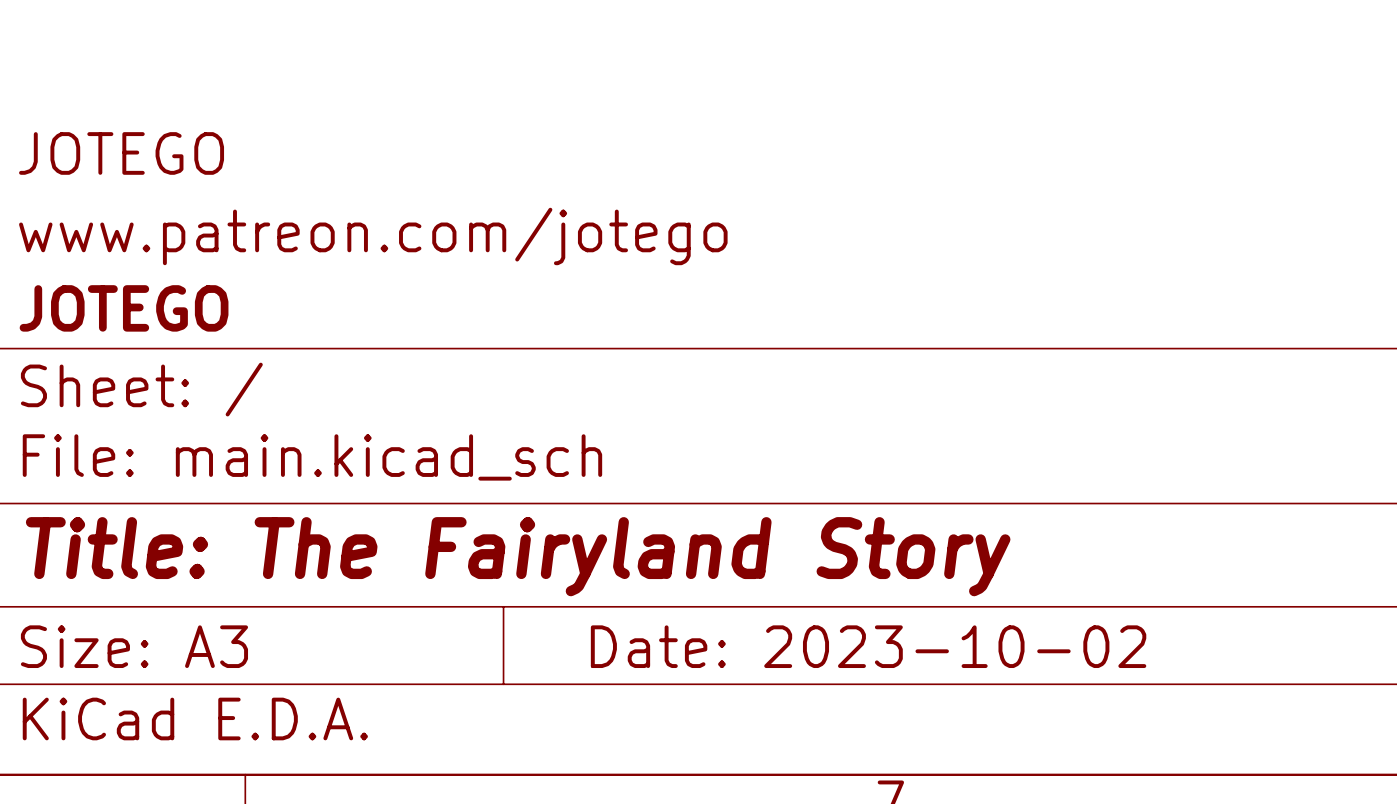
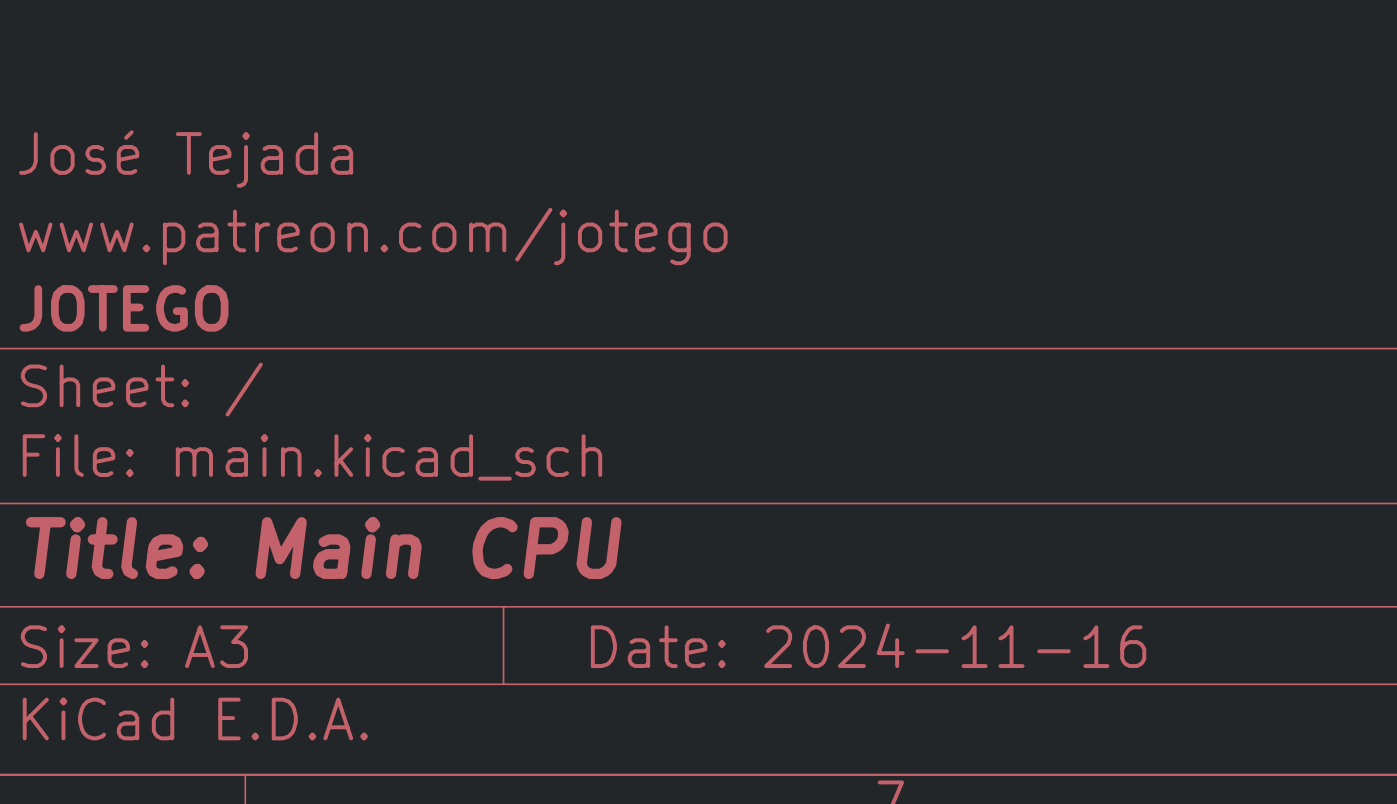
title block: JOTEGO (121, 153) -> José Tejada (186, 159)
title block: Title: The Fairyland Story (518, 556) -> Title: Main CPU (323, 548)
title block: Date: 2023-10-02 (868, 646) -> Date: 2024-11-16 (868, 645)

